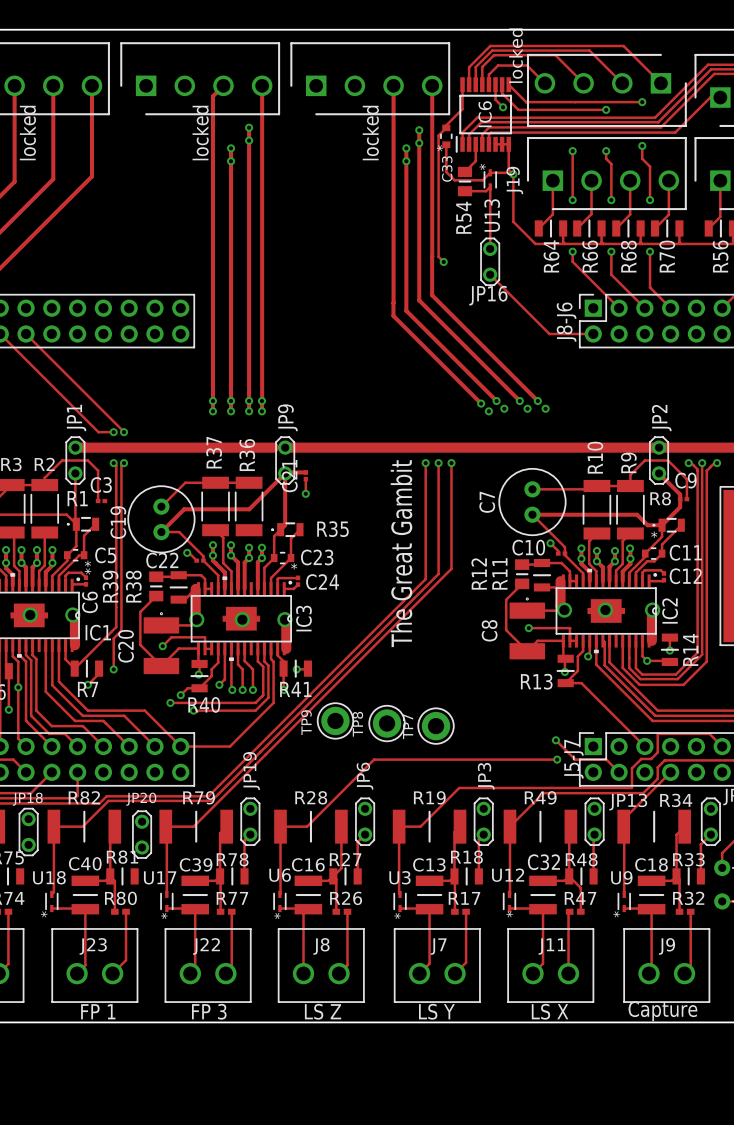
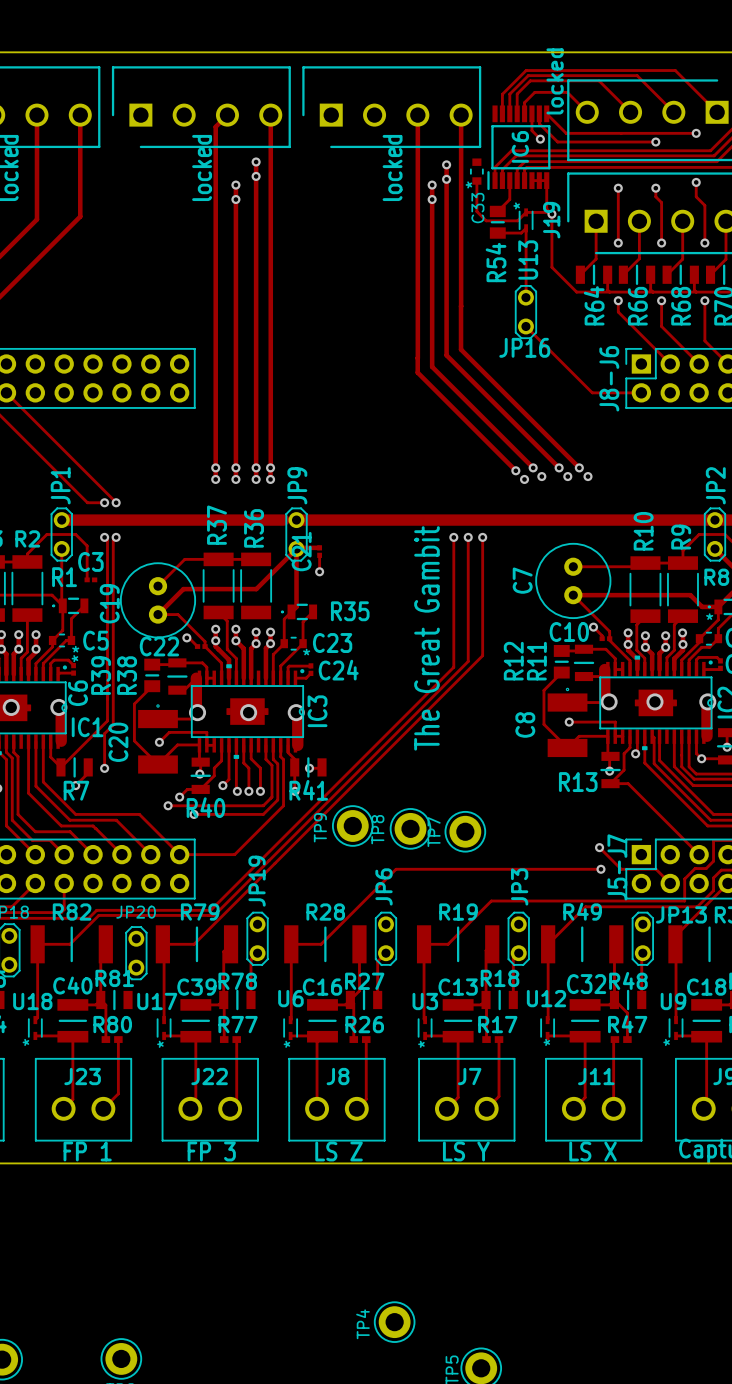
track: (462, 84) (462, 109) (443, 127) -> none
track: (446, 127) (438, 135) (438, 256) (443, 261) -> none
via: (443, 261) -> none

